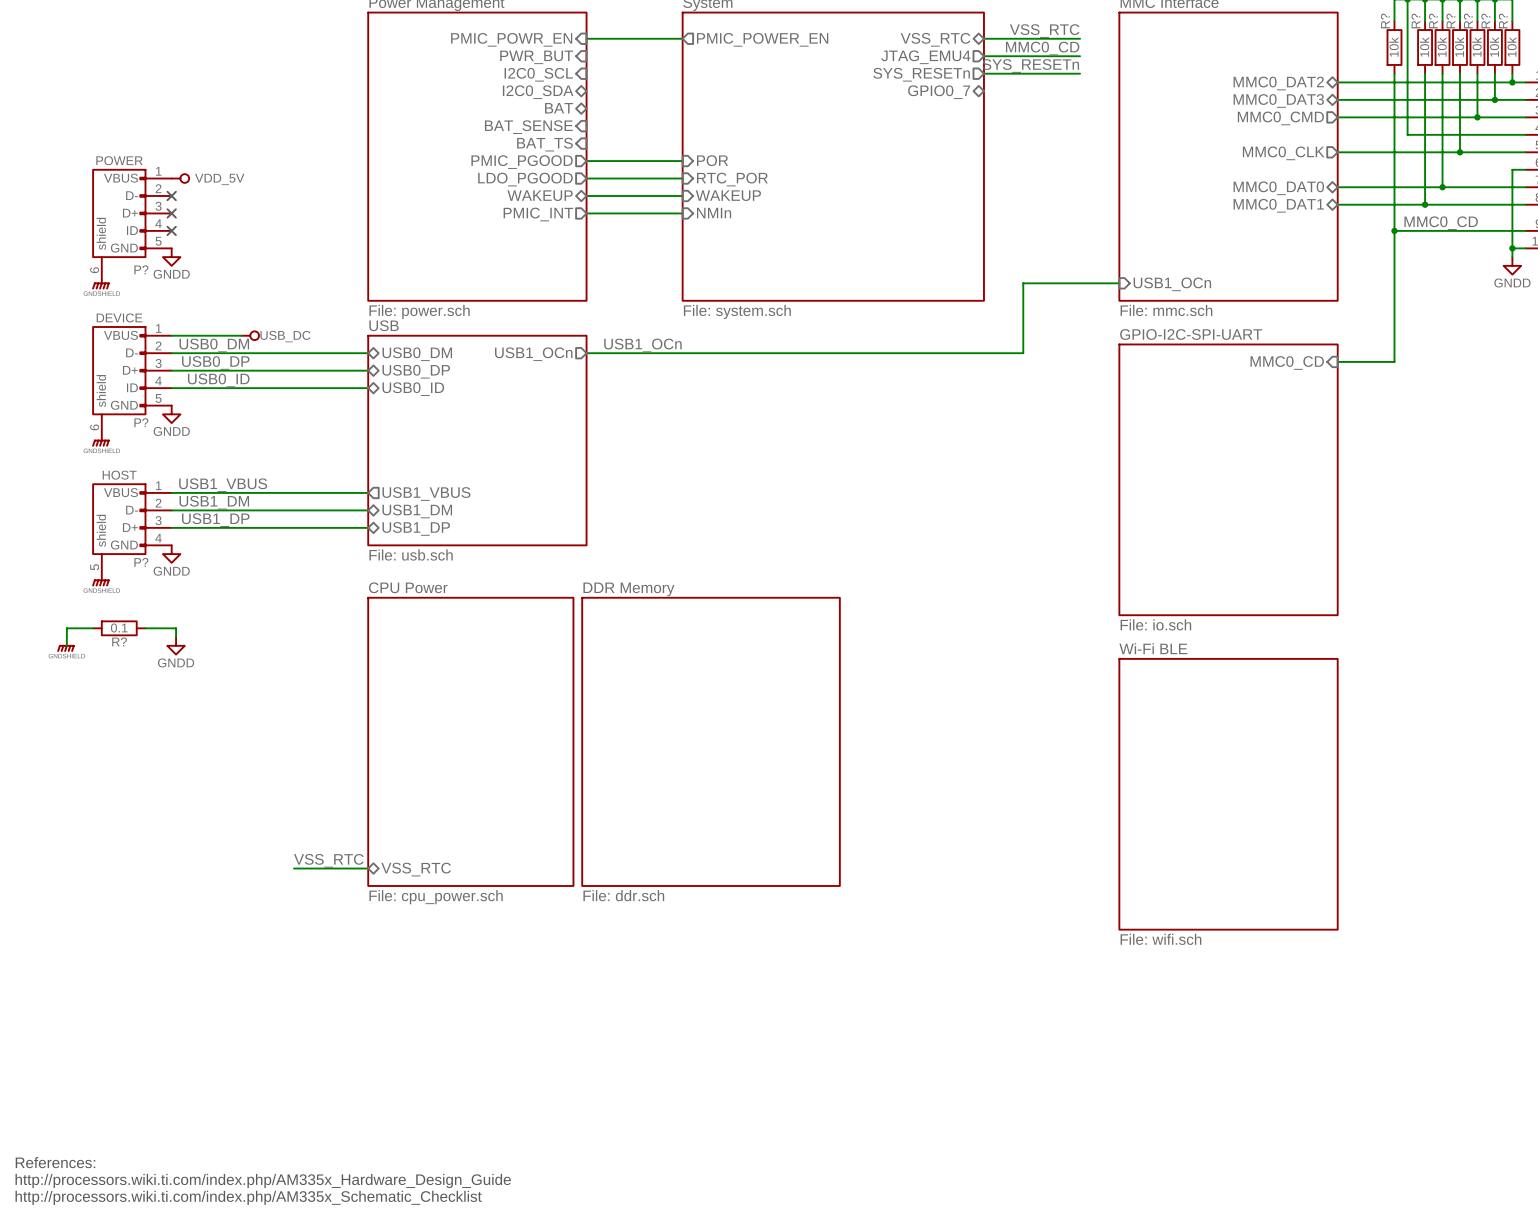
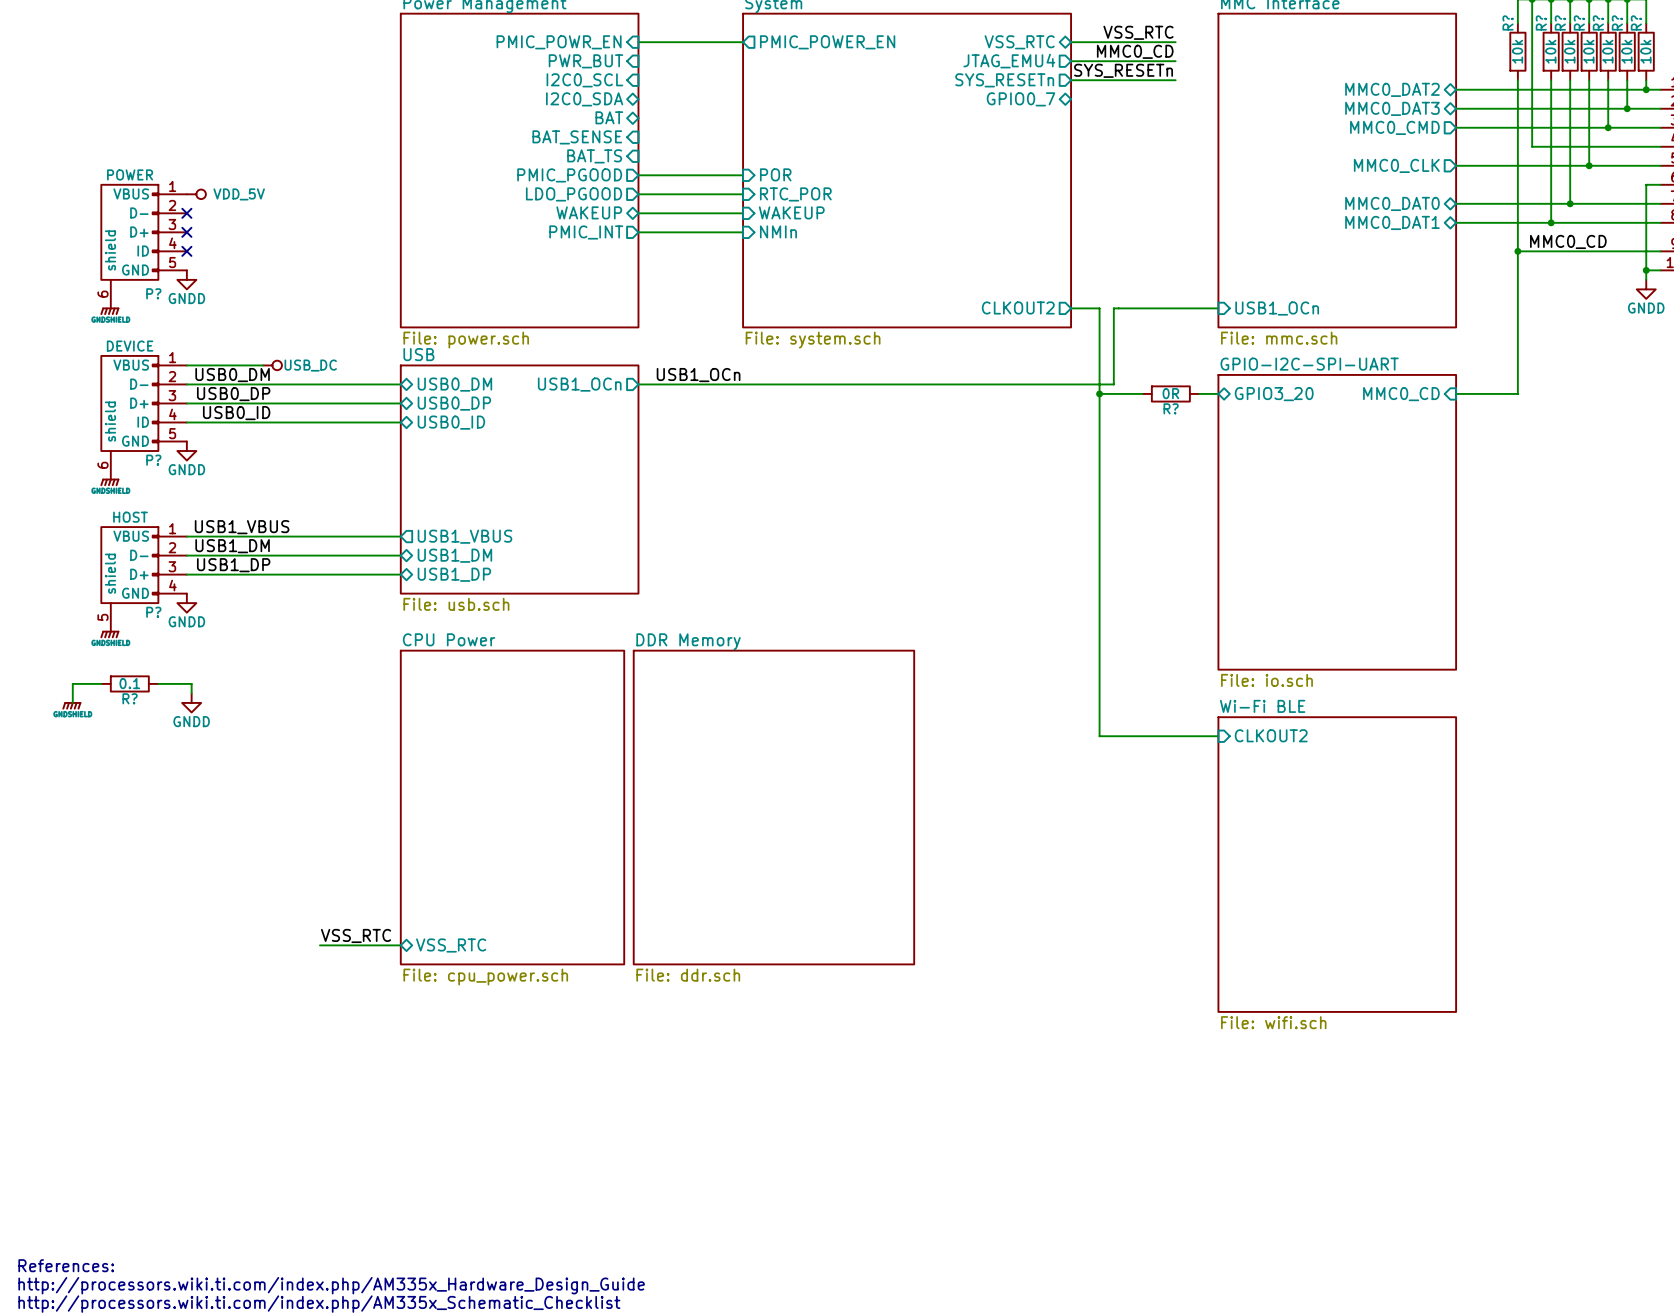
sheet pin: none -> CLKOUT2 (1018, 307)
wire: none -> (1071, 308) (1099, 308) (1099, 736) (1218, 736)
wire: none -> (1099, 393) (1142, 393)
junction: none -> (1099, 393)
R?: none -> 0R (1170, 393)
wire: none -> (1199, 393) (1218, 393)
sheet pin: none -> GPIO3_20 (1274, 394)
sheet pin: none -> CLKOUT2 (1271, 735)

